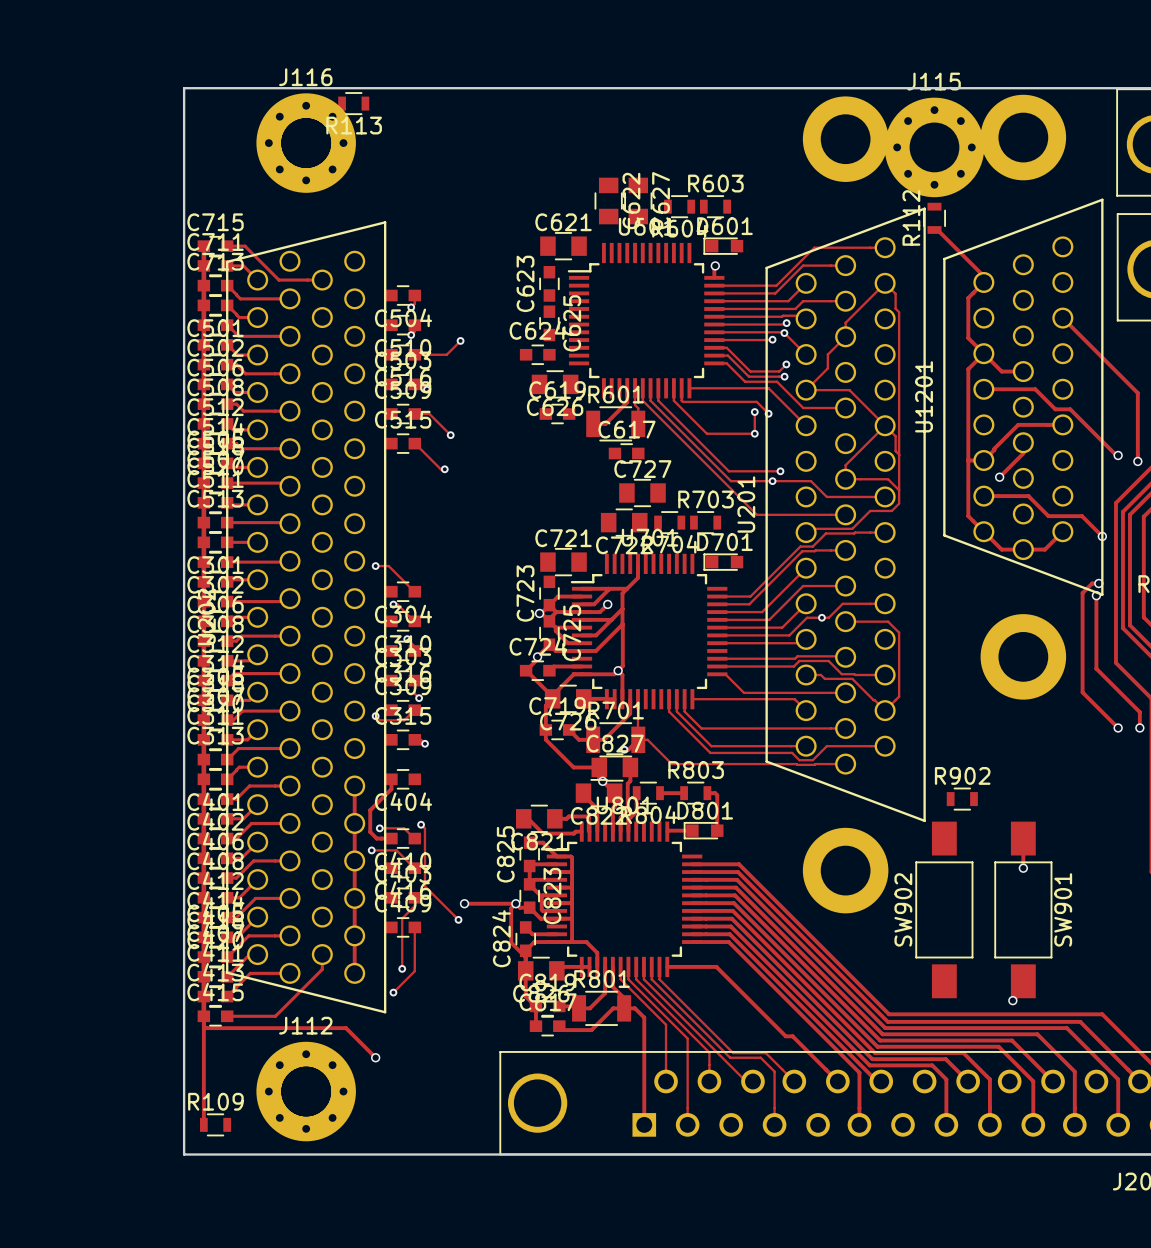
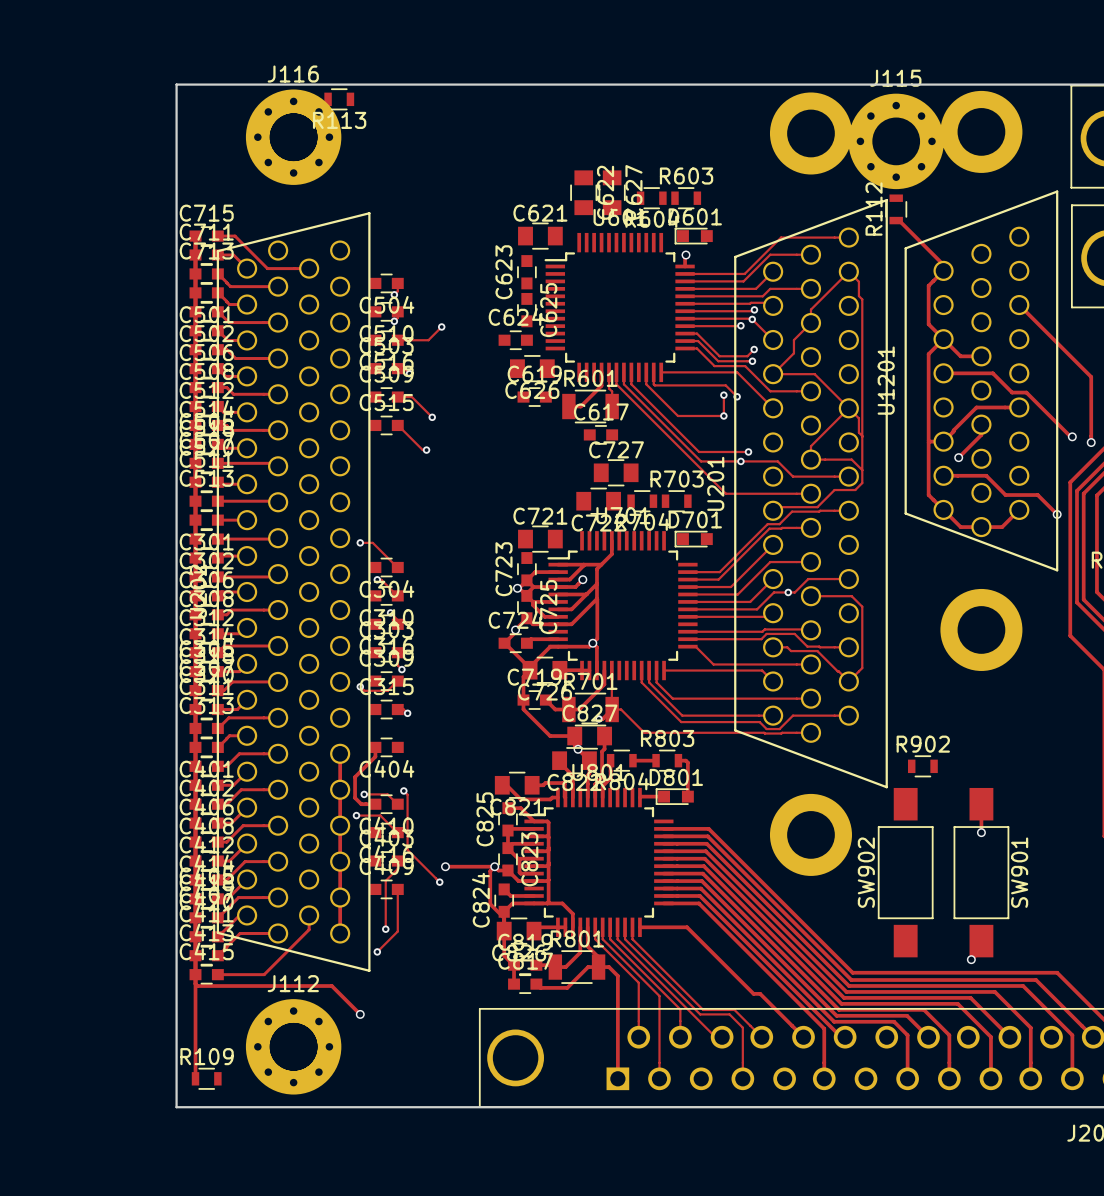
track: (1098, 583) (1092, 583) (1082, 593) (1082, 692) (1118, 727) -> none
via: (1098, 583) -> none
track: (1096, 595) (1096, 668) (1139, 712) (1139, 727) -> none
via: (1096, 595) -> none
via: (1118, 727) -> none
via: (1139, 727) -> none

